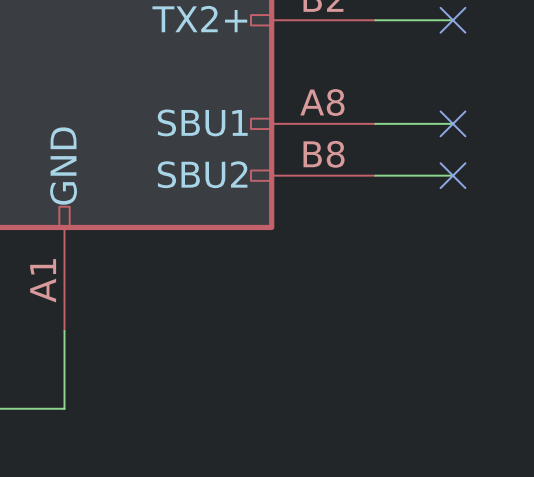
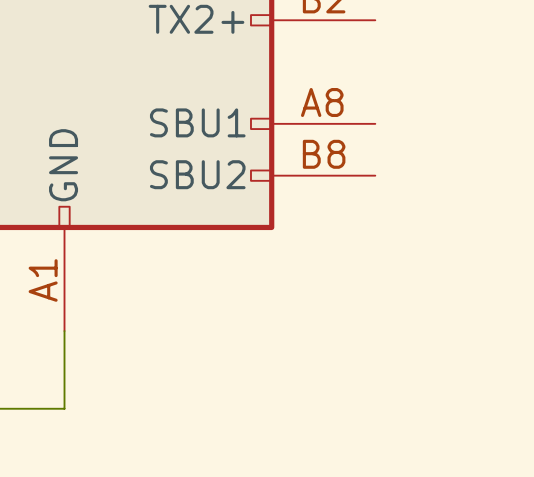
wire: (375, 20) (453, 20) -> none
no-connect mark: (453, 20) -> none
wire: (375, 123) (453, 123) -> none
no-connect mark: (453, 123) -> none
wire: (375, 175) (453, 175) -> none
no-connect mark: (453, 175) -> none

